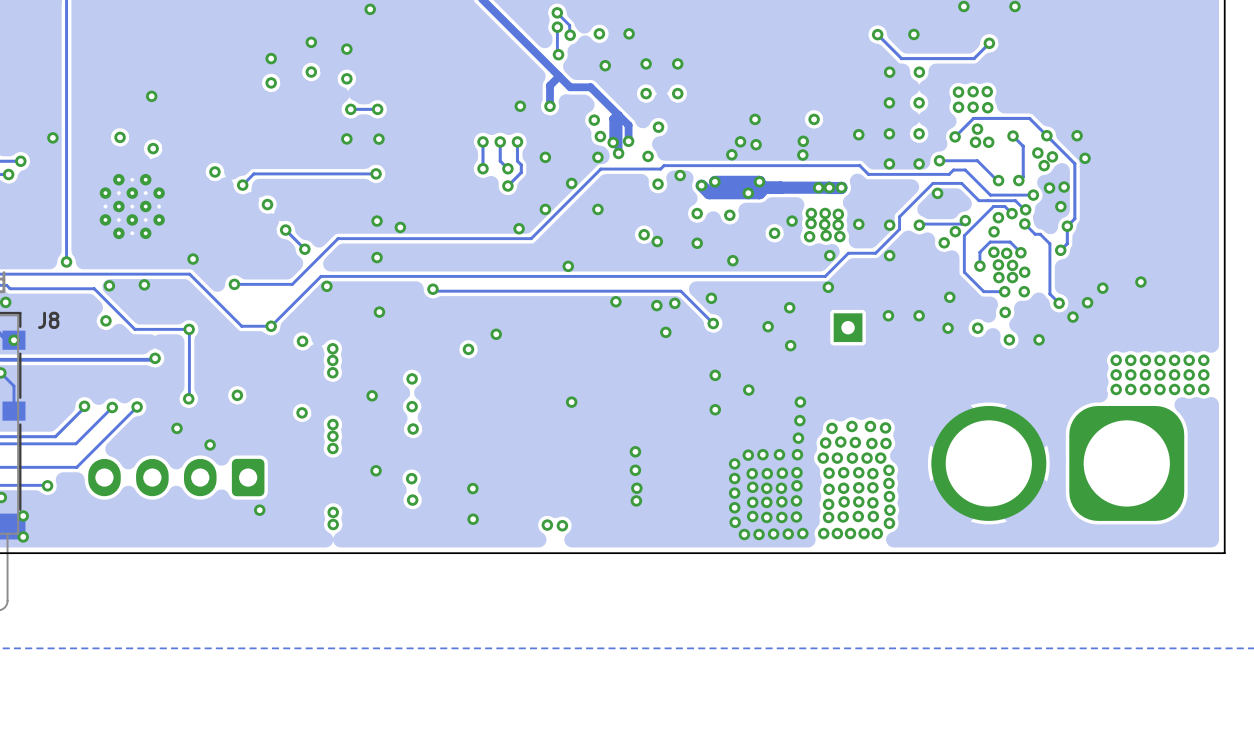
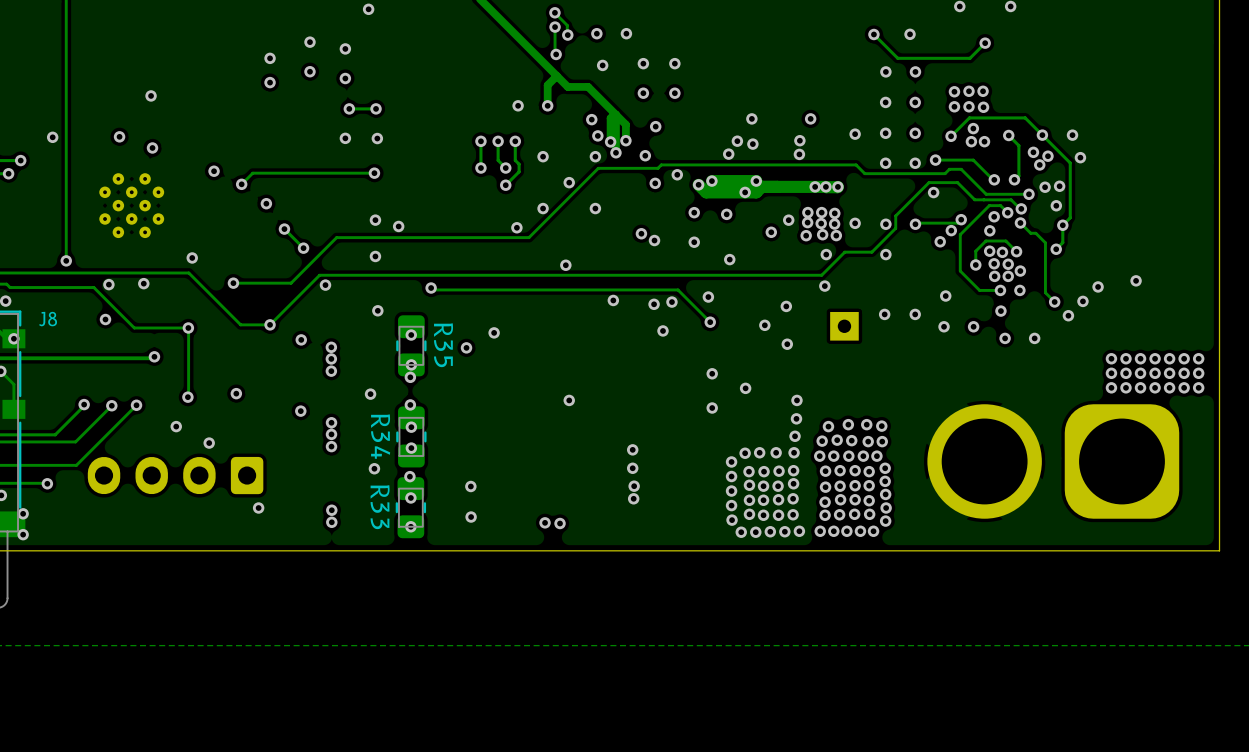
via: none -> (411, 335)
R35: none -> (411, 345)
via: none -> (411, 364)
R34: none -> (411, 436)
via: none -> (411, 448)
R33: none -> (410, 507)
via: none -> (410, 526)

